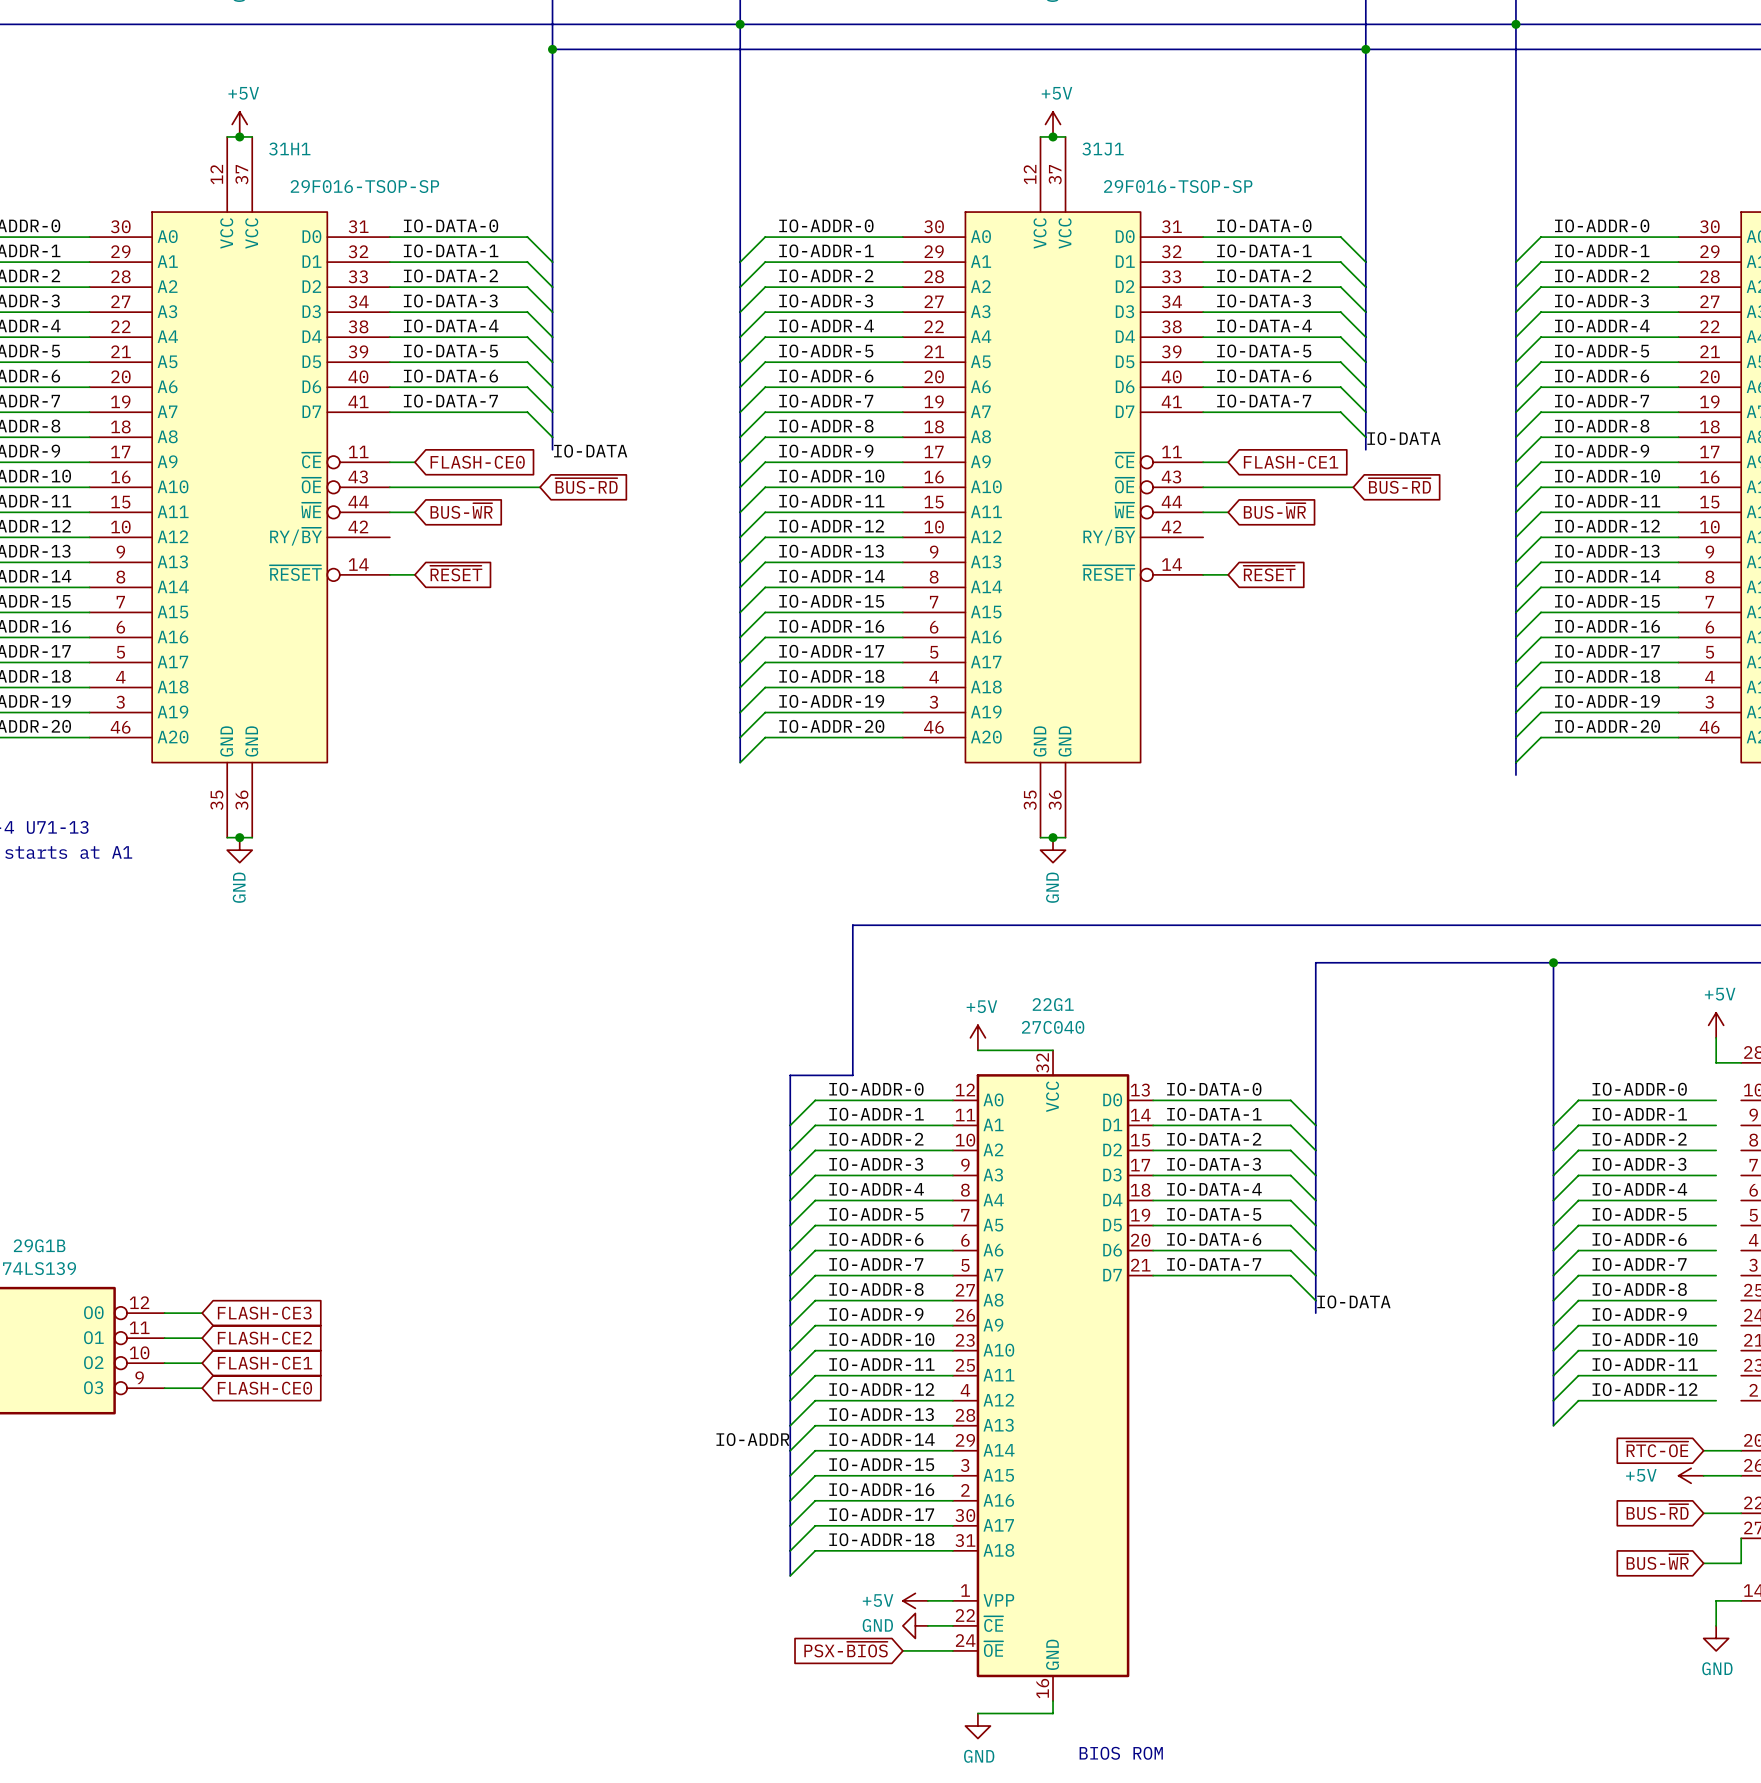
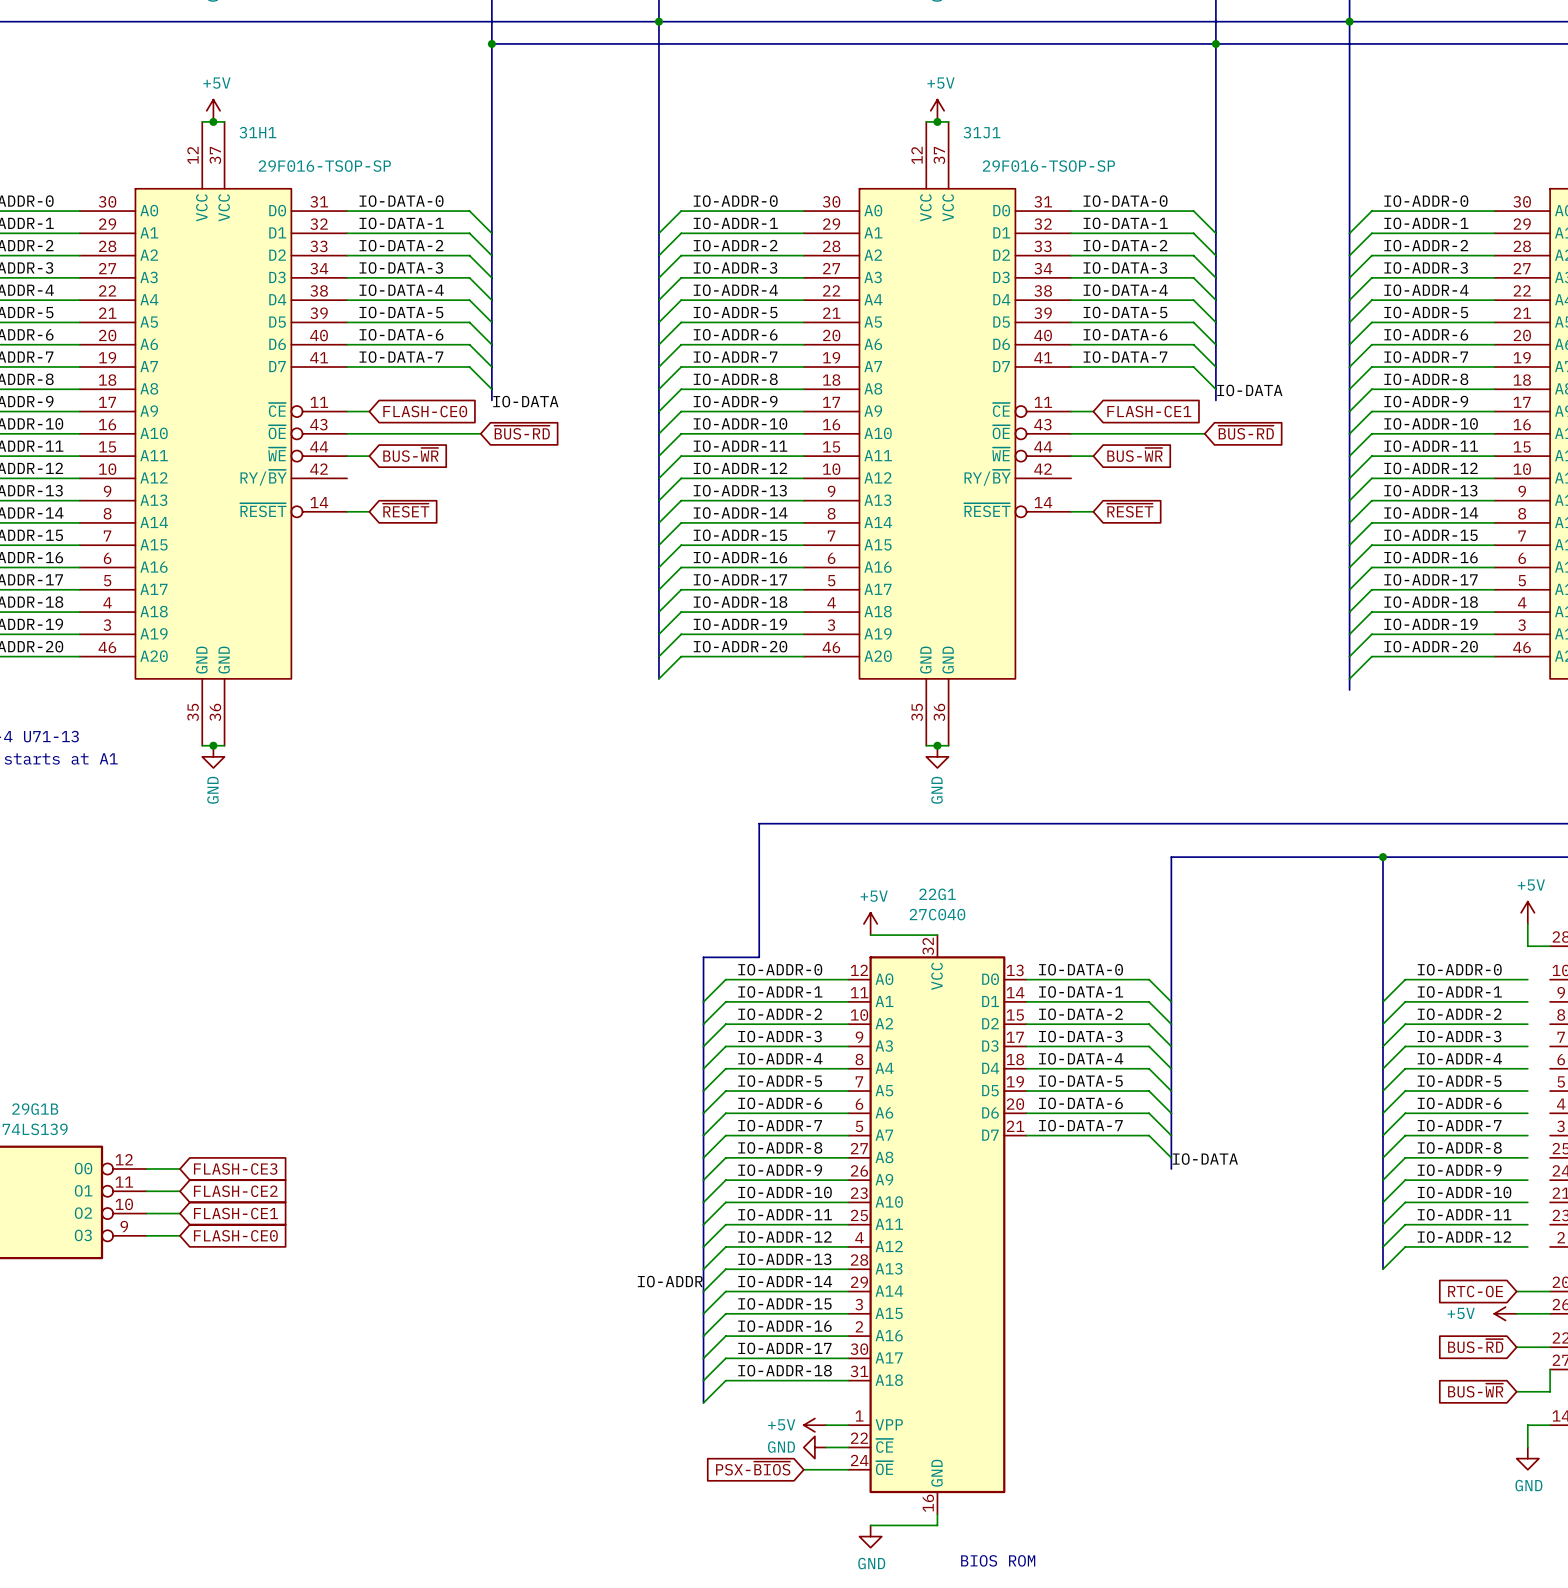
global label: ~{RTC-OE} (1657, 1449) -> RTC-OE (1475, 1291)

